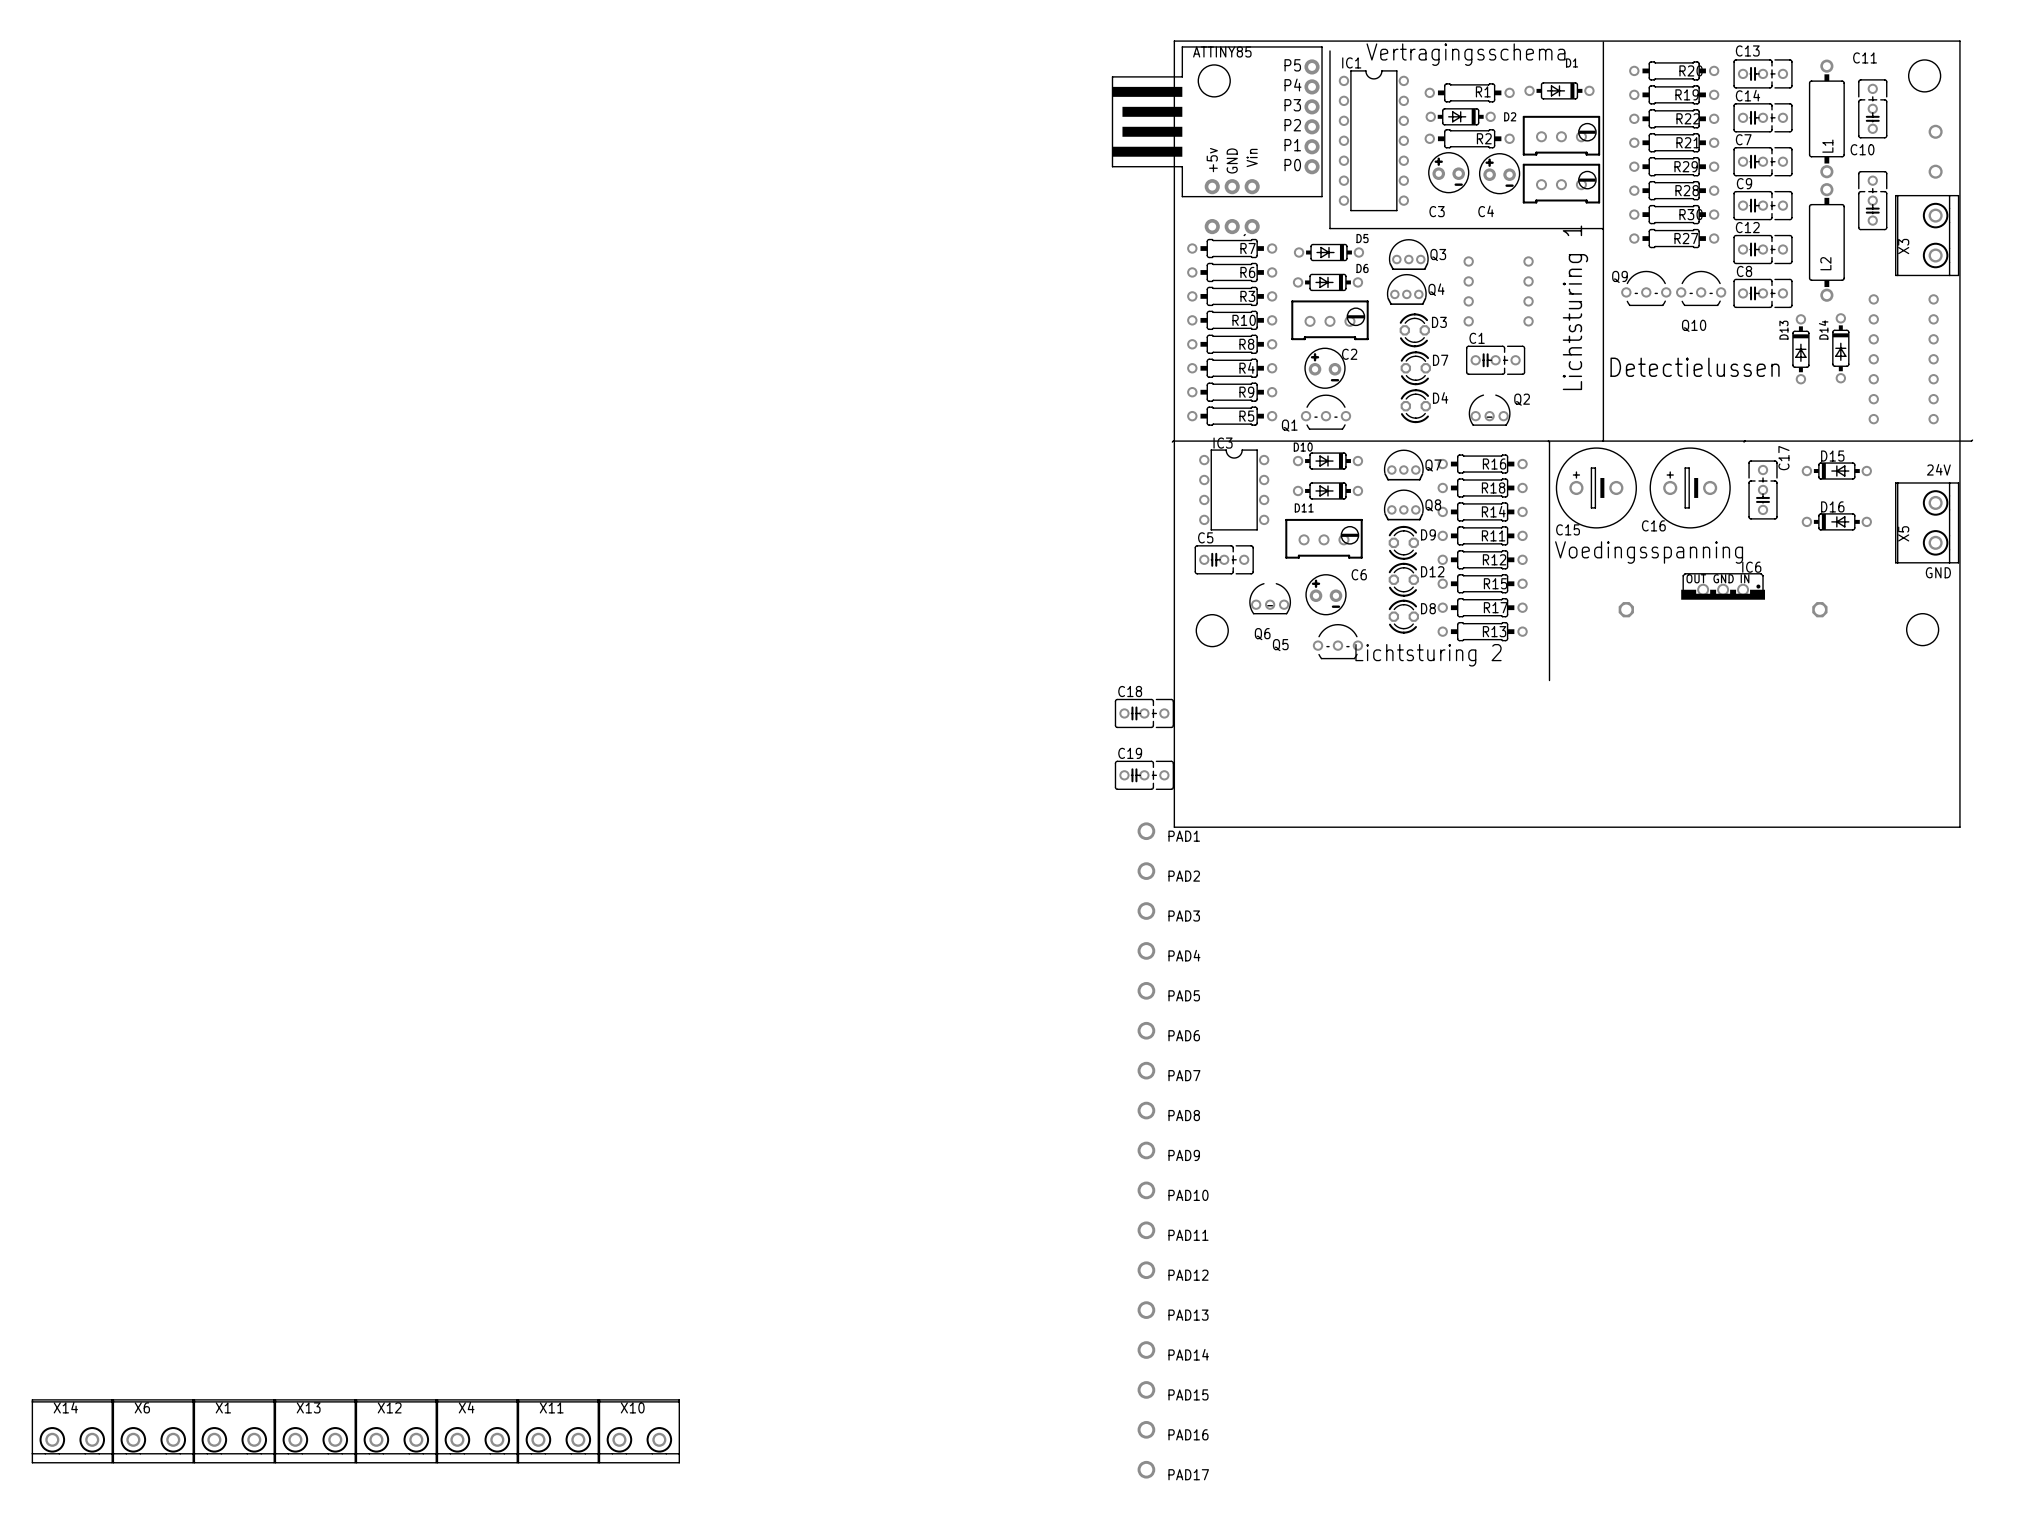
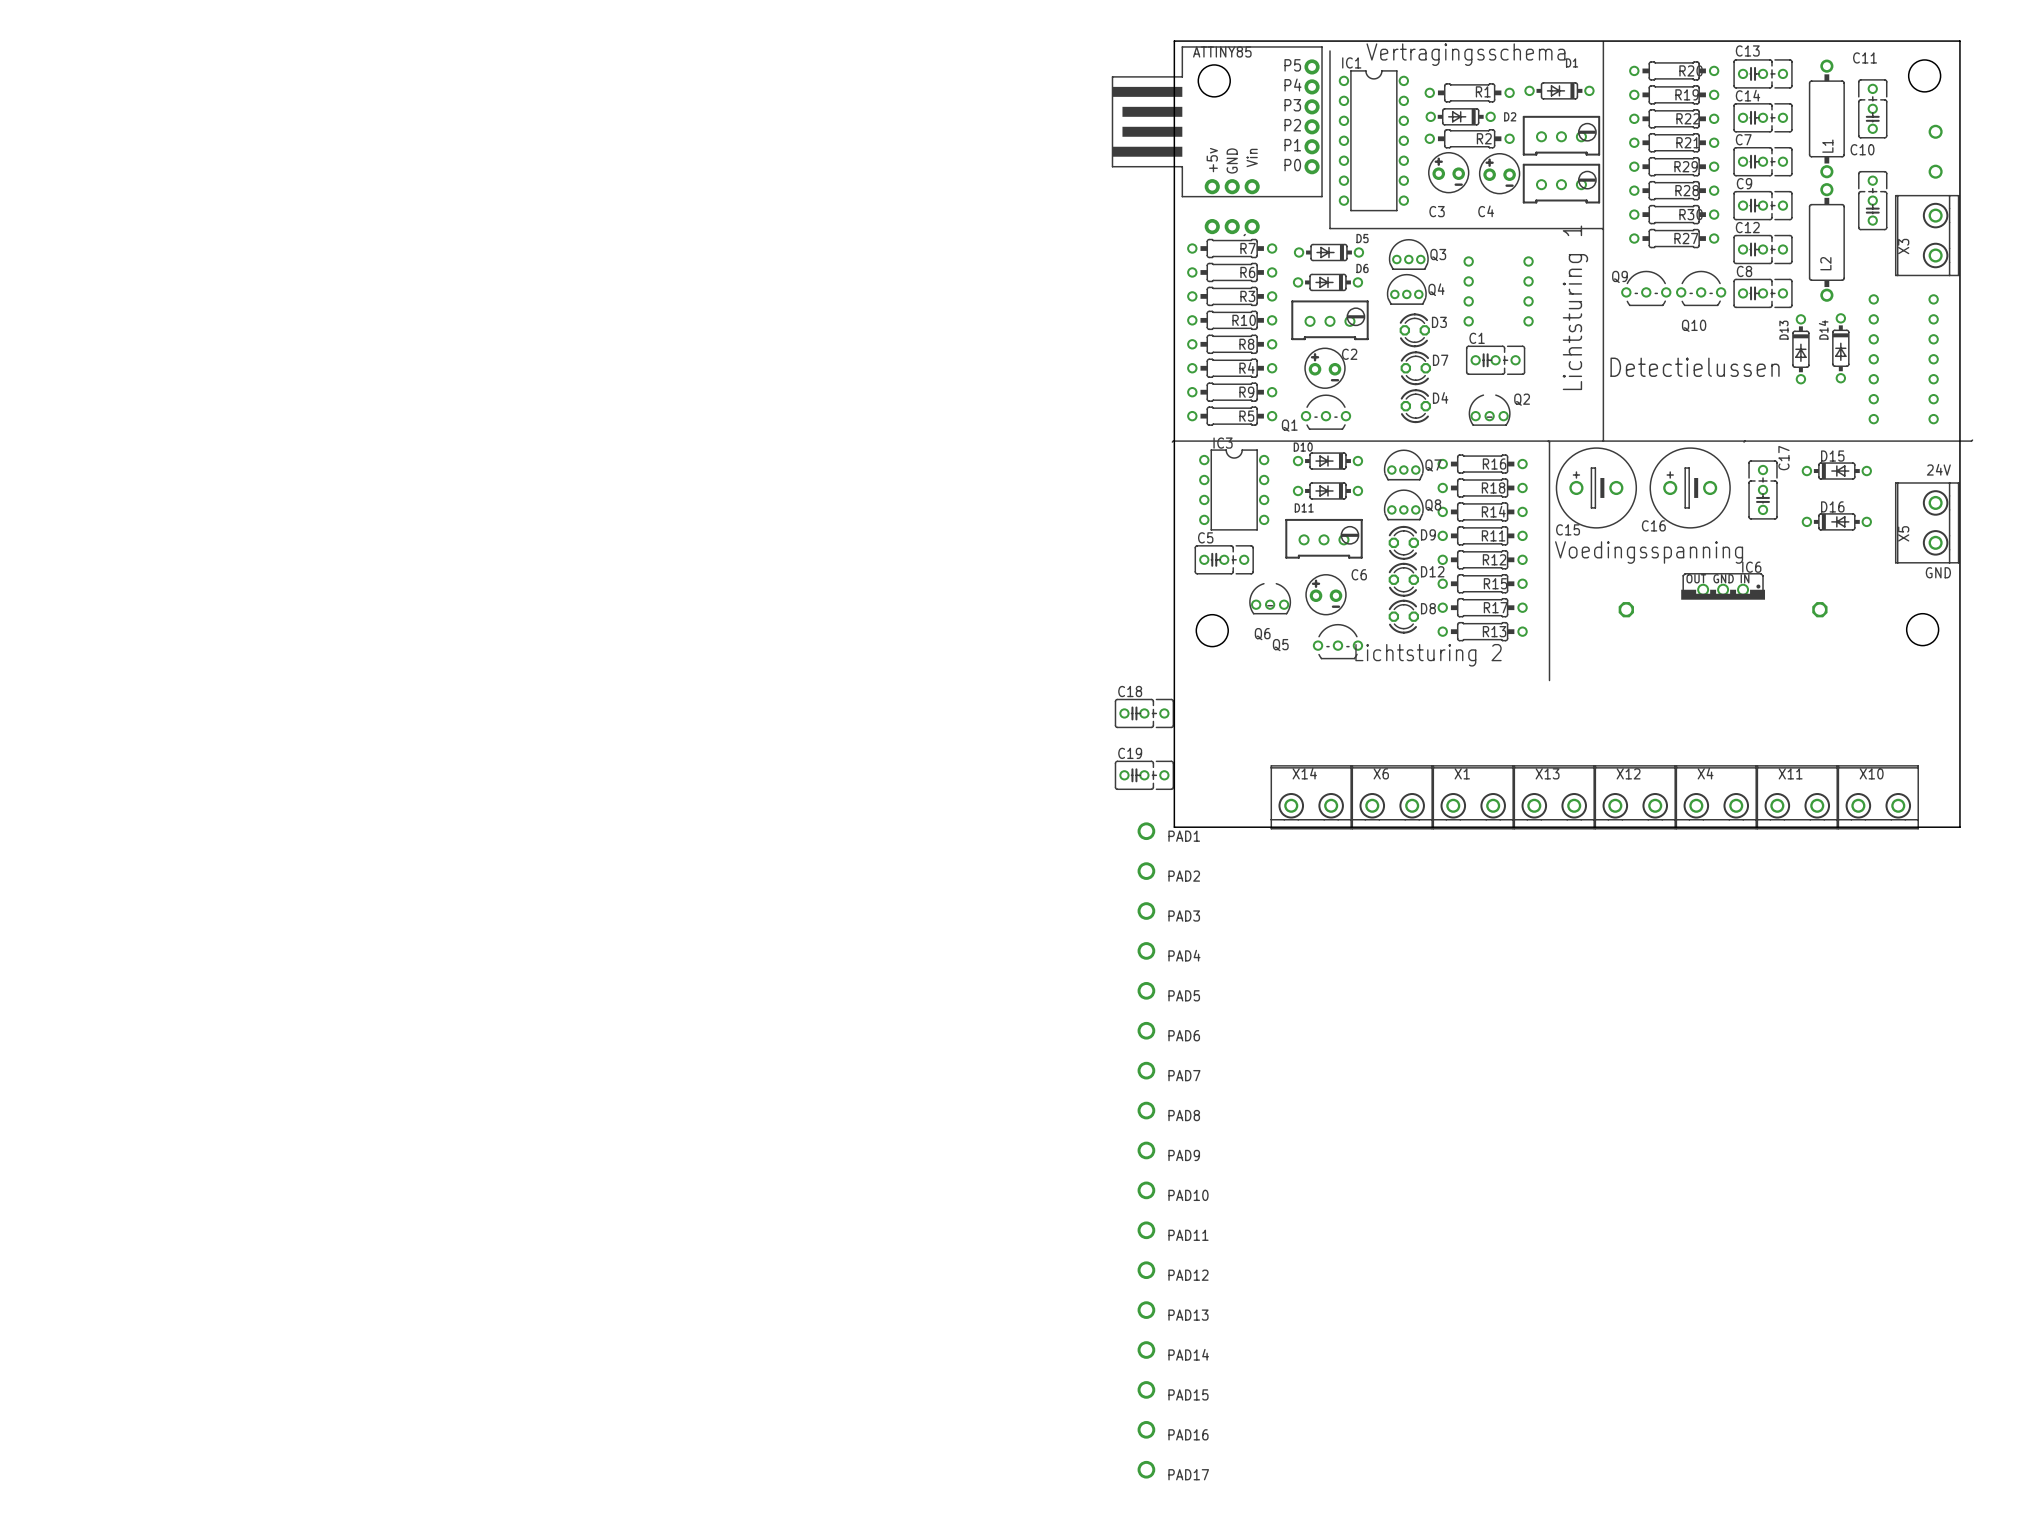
X14 position: (72, 1431) -> (1311, 797)
X6 position: (153, 1431) -> (1392, 797)
X1 position: (234, 1431) -> (1473, 797)
X13 position: (315, 1431) -> (1554, 797)
X12 position: (396, 1431) -> (1635, 797)
X4 position: (477, 1431) -> (1716, 797)
X11 position: (558, 1431) -> (1797, 797)
X10 position: (639, 1431) -> (1878, 797)

